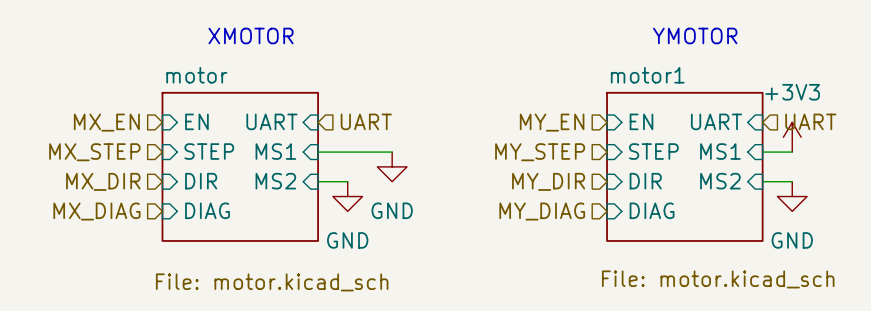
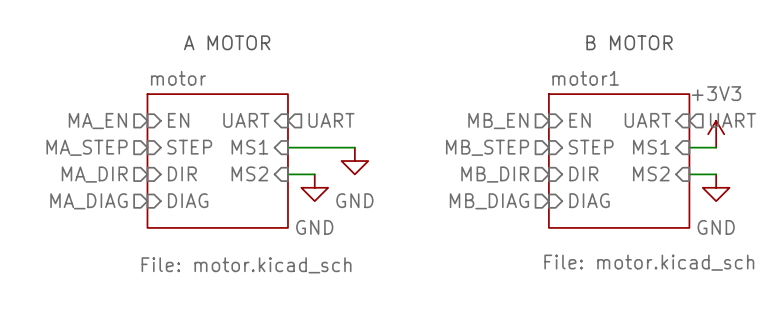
text: XMOTOR (251, 35) -> A MOTOR (227, 42)
text: YMOTOR (695, 35) -> B MOTOR (629, 42)
hierarchical label: MX_EN (106, 122) -> MA_EN (97, 121)
hierarchical label: MY_EN (552, 122) -> MB_EN (498, 121)
hierarchical label: MX_STEP (94, 152) -> MA_STEP (87, 147)
hierarchical label: MY_STEP (540, 152) -> MB_STEP (487, 147)
hierarchical label: MX_DIR (103, 181) -> MA_DIR (94, 174)
hierarchical label: MY_DIR (548, 181) -> MB_DIR (495, 174)
hierarchical label: MX_DIAG (96, 211) -> MA_DIAG (88, 201)
hierarchical label: MY_DIAG (542, 211) -> MB_DIAG (489, 201)

